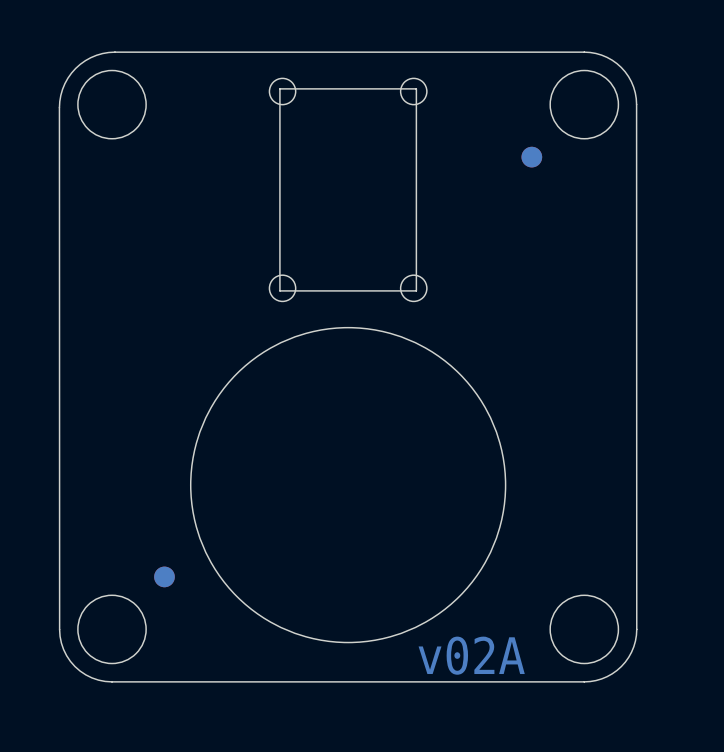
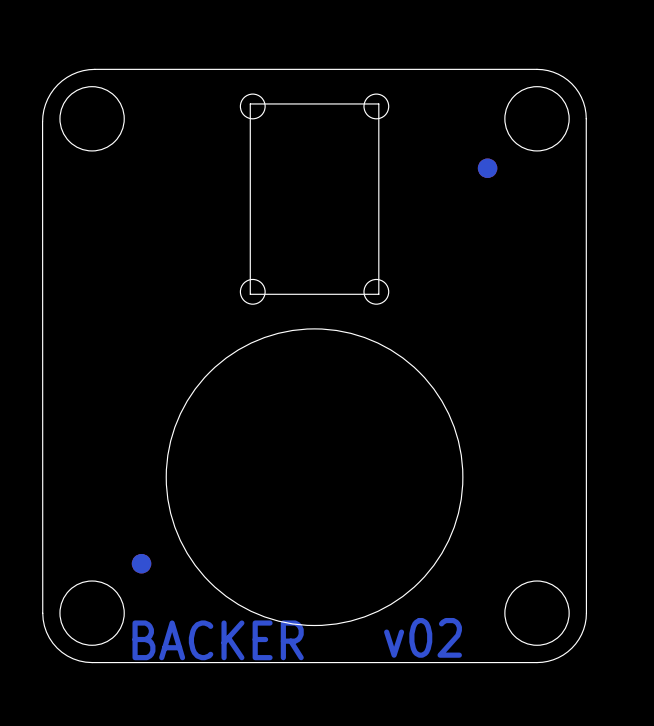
text: v02A (471, 655) -> v02 (423, 637)
text: none -> BACKER (218, 640)

